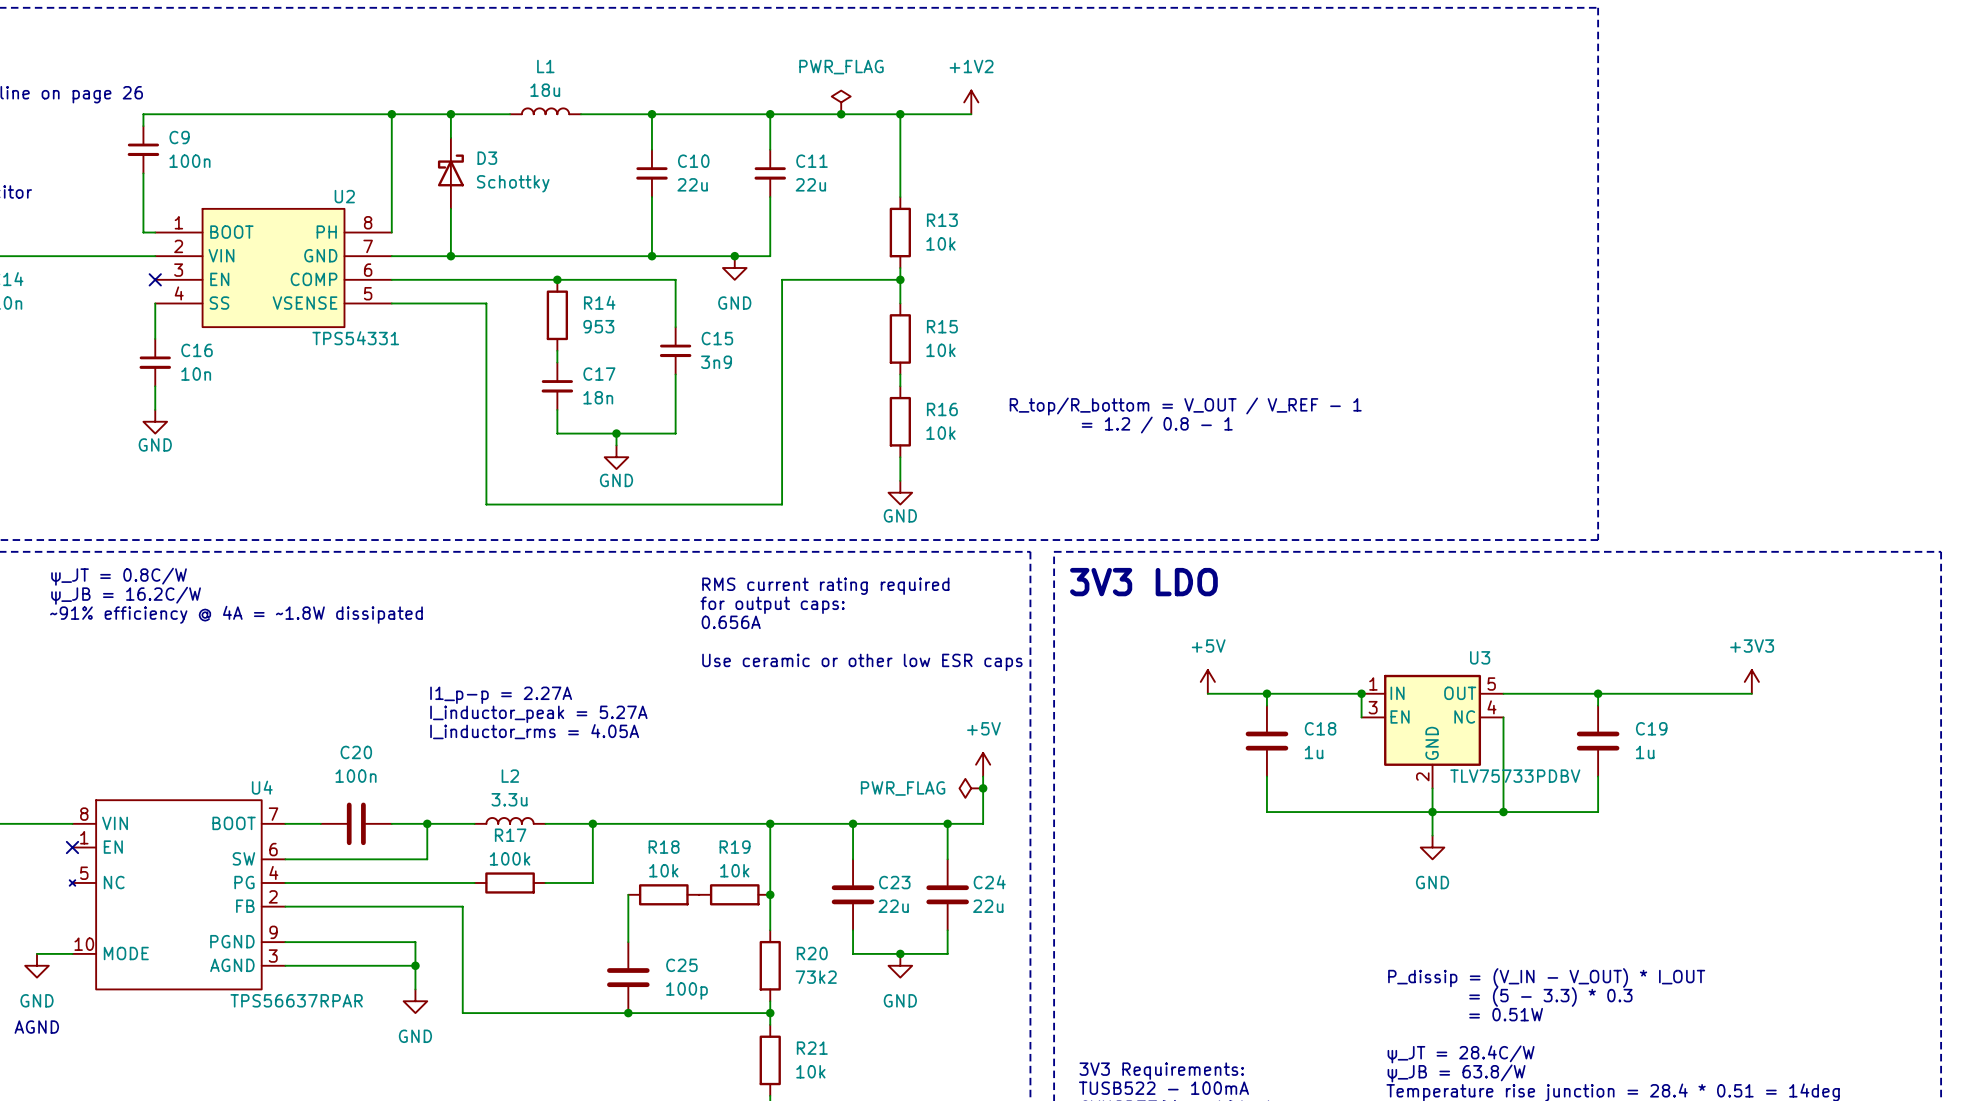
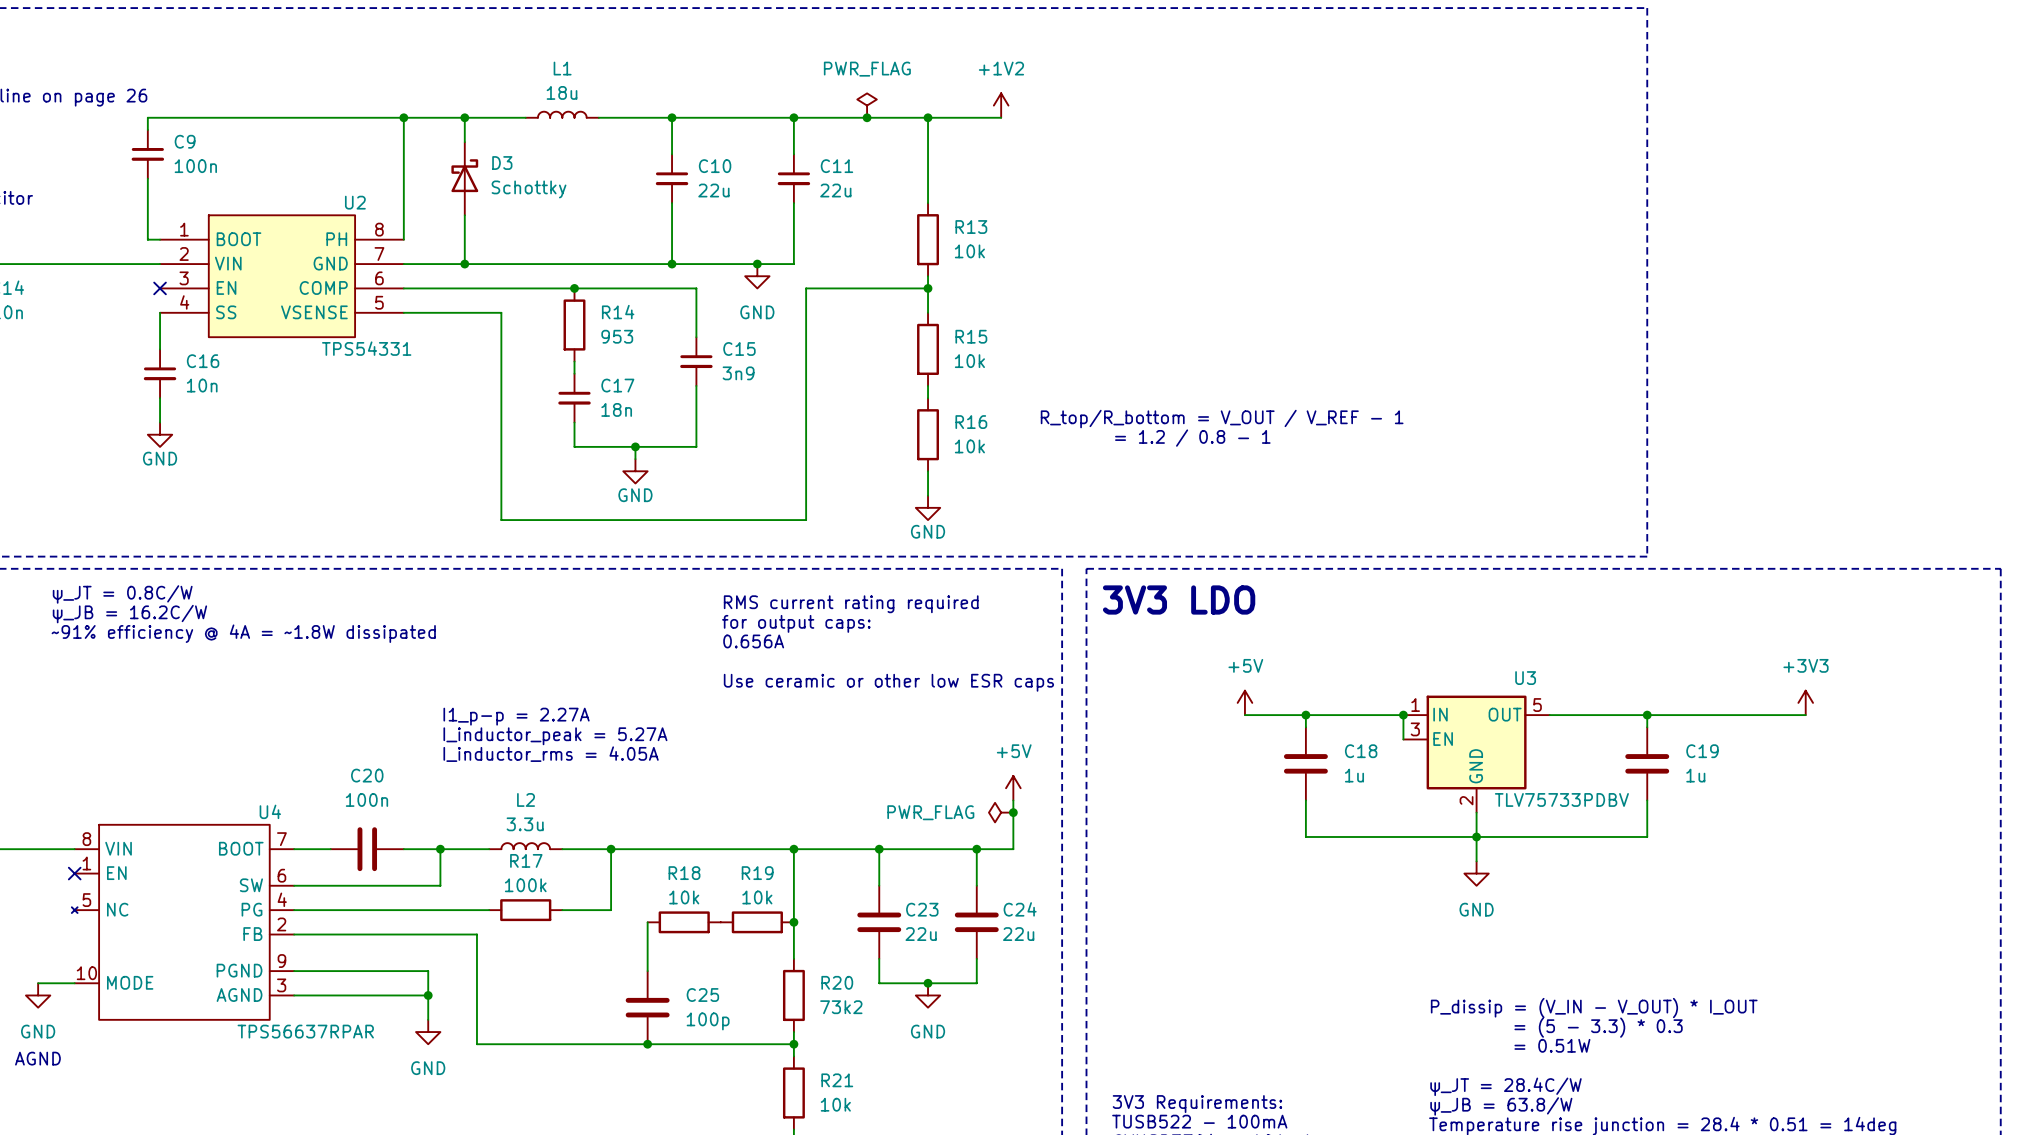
U3 symbol: [1361, 674, 1504, 789] -> [1403, 695, 1550, 813]
wire: (1503, 717) (1503, 812) -> none
junction: (1503, 812) -> none

